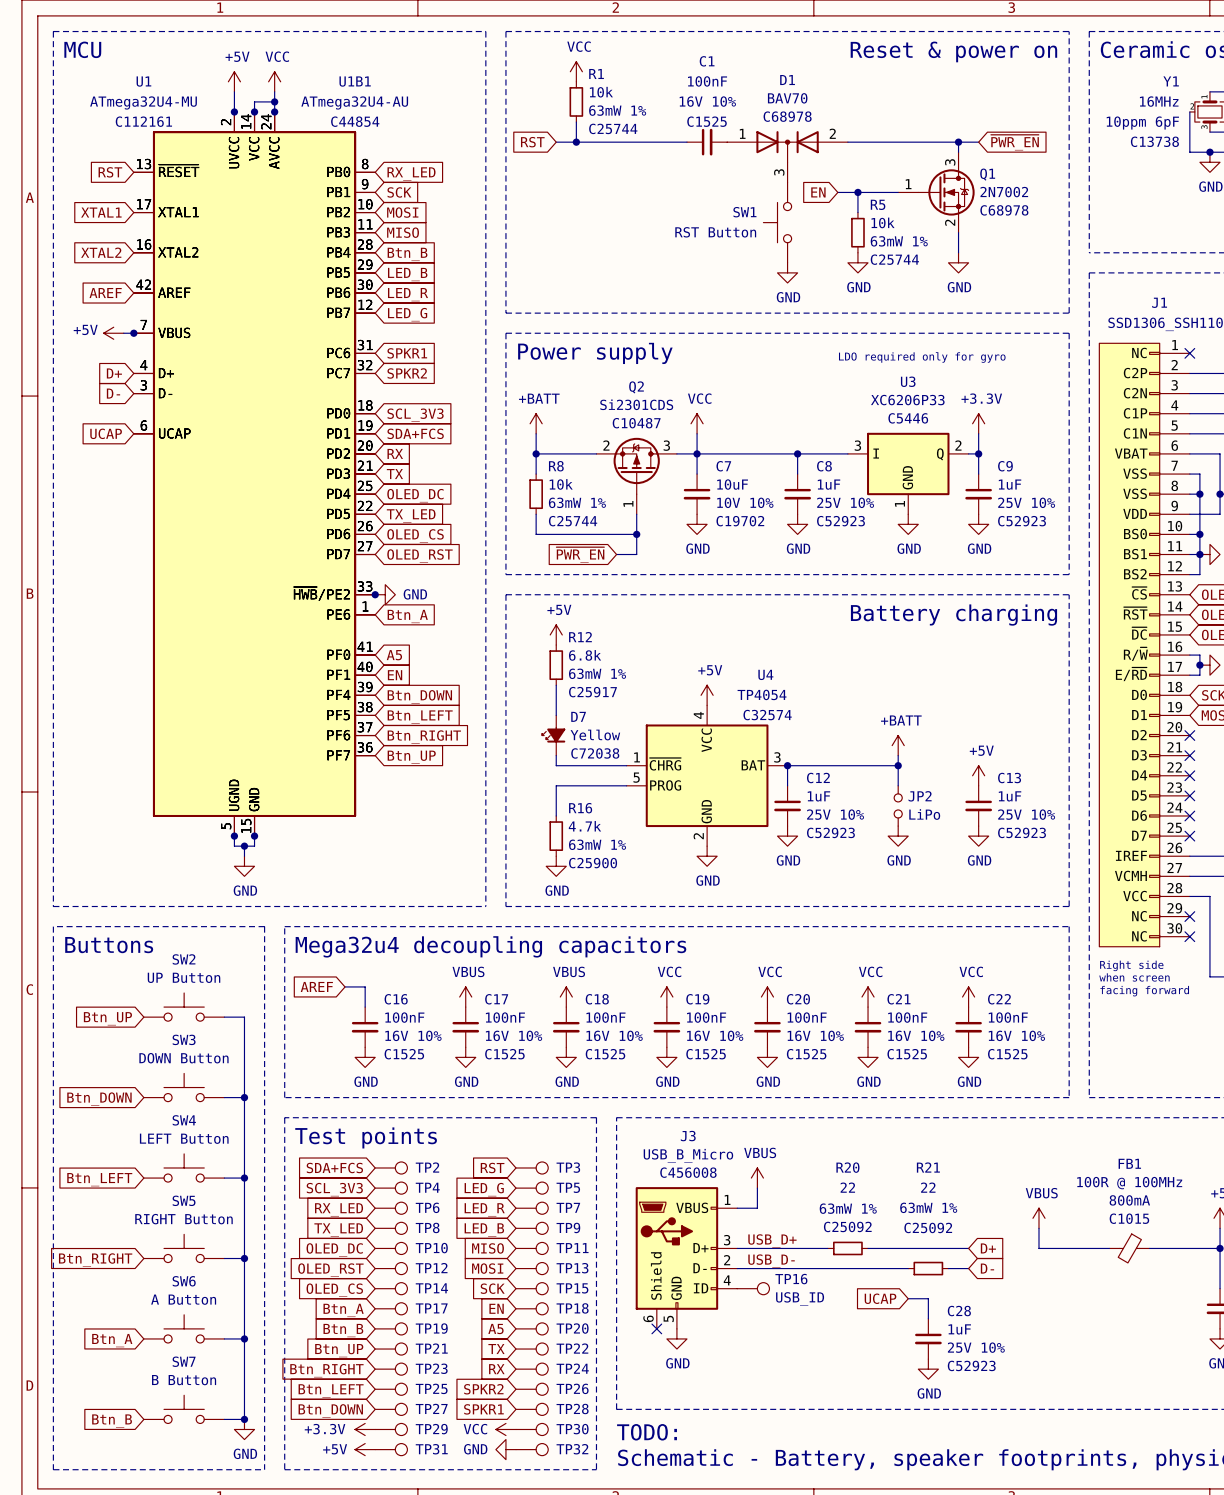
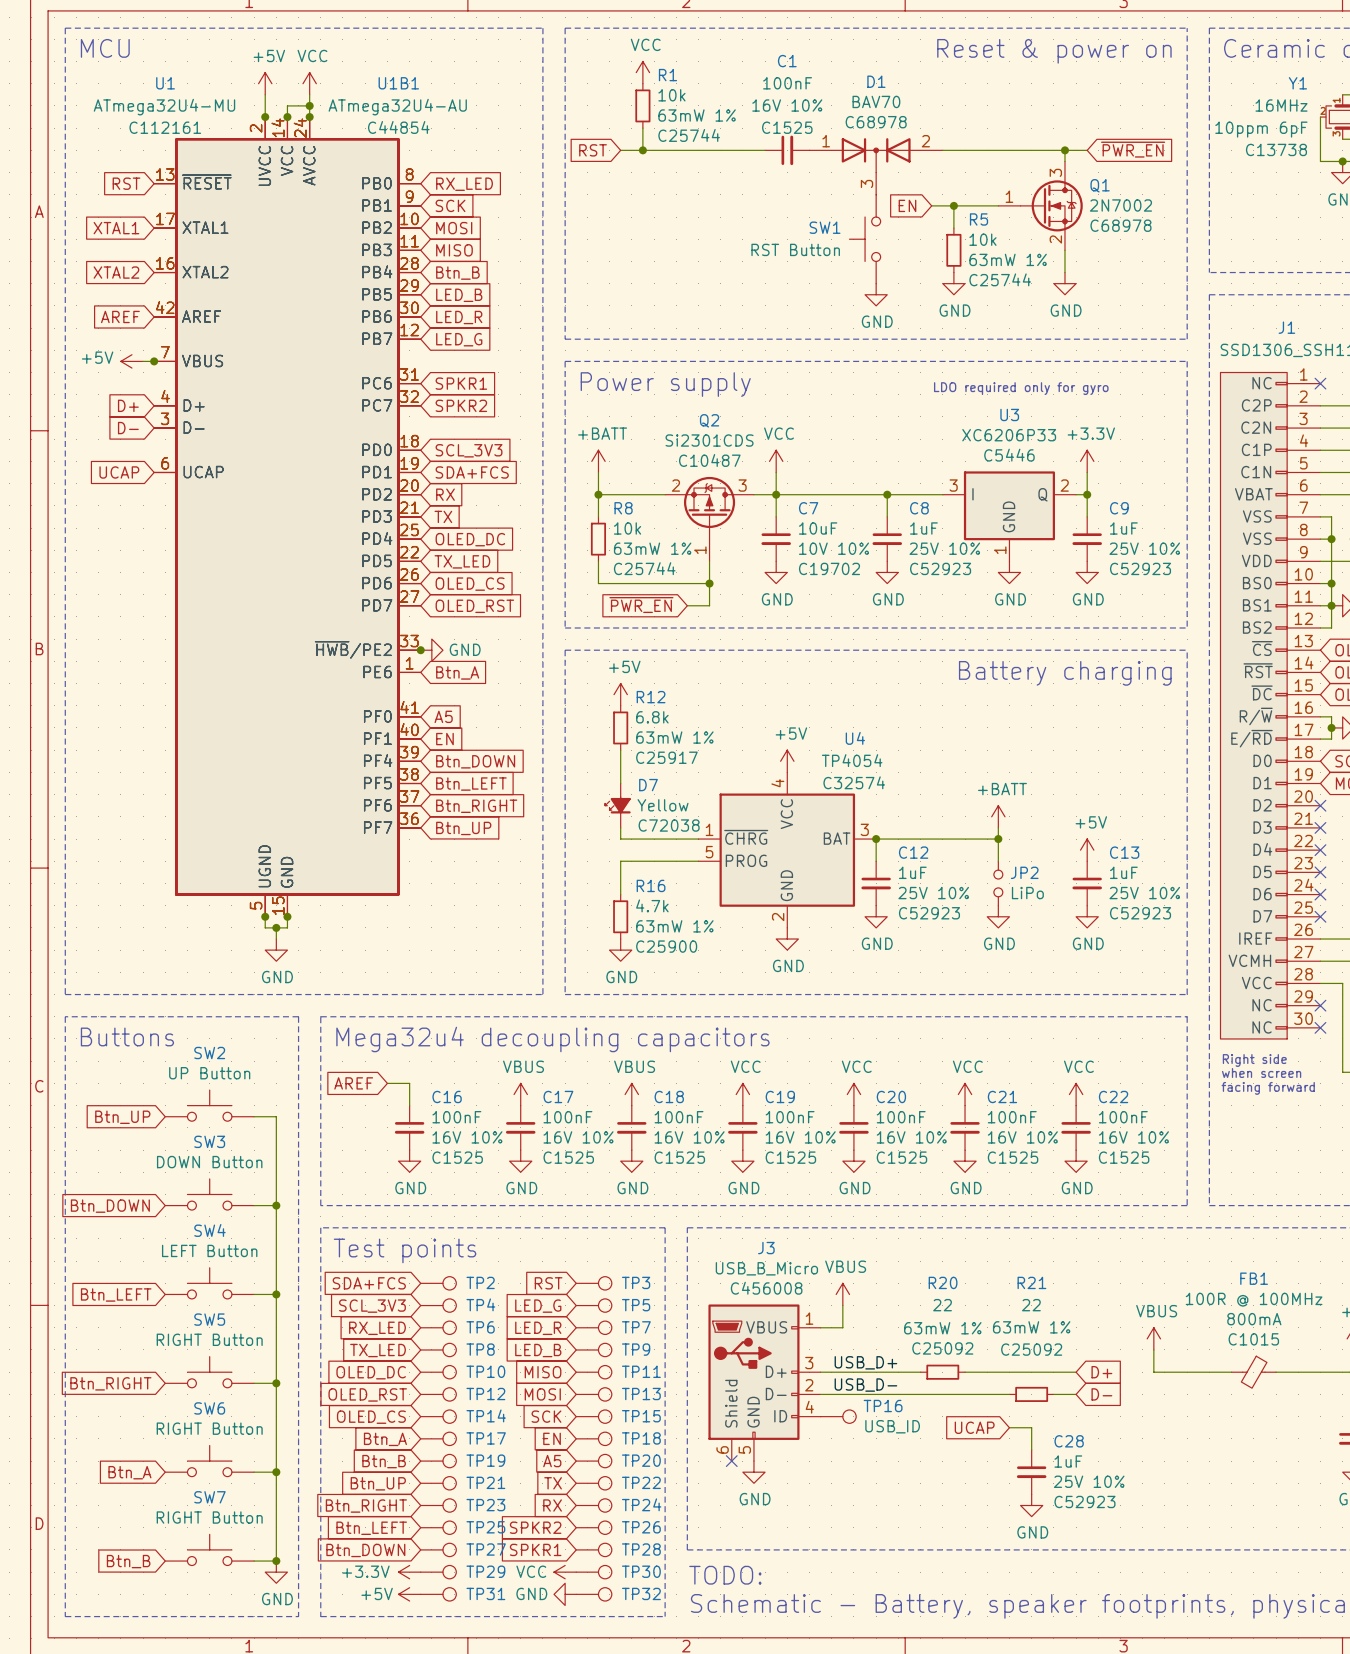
SW6 value: A Button (183, 1299) -> RIGHT Button (209, 1428)
SW7 value: B Button (184, 1380) -> RIGHT Button (209, 1517)

